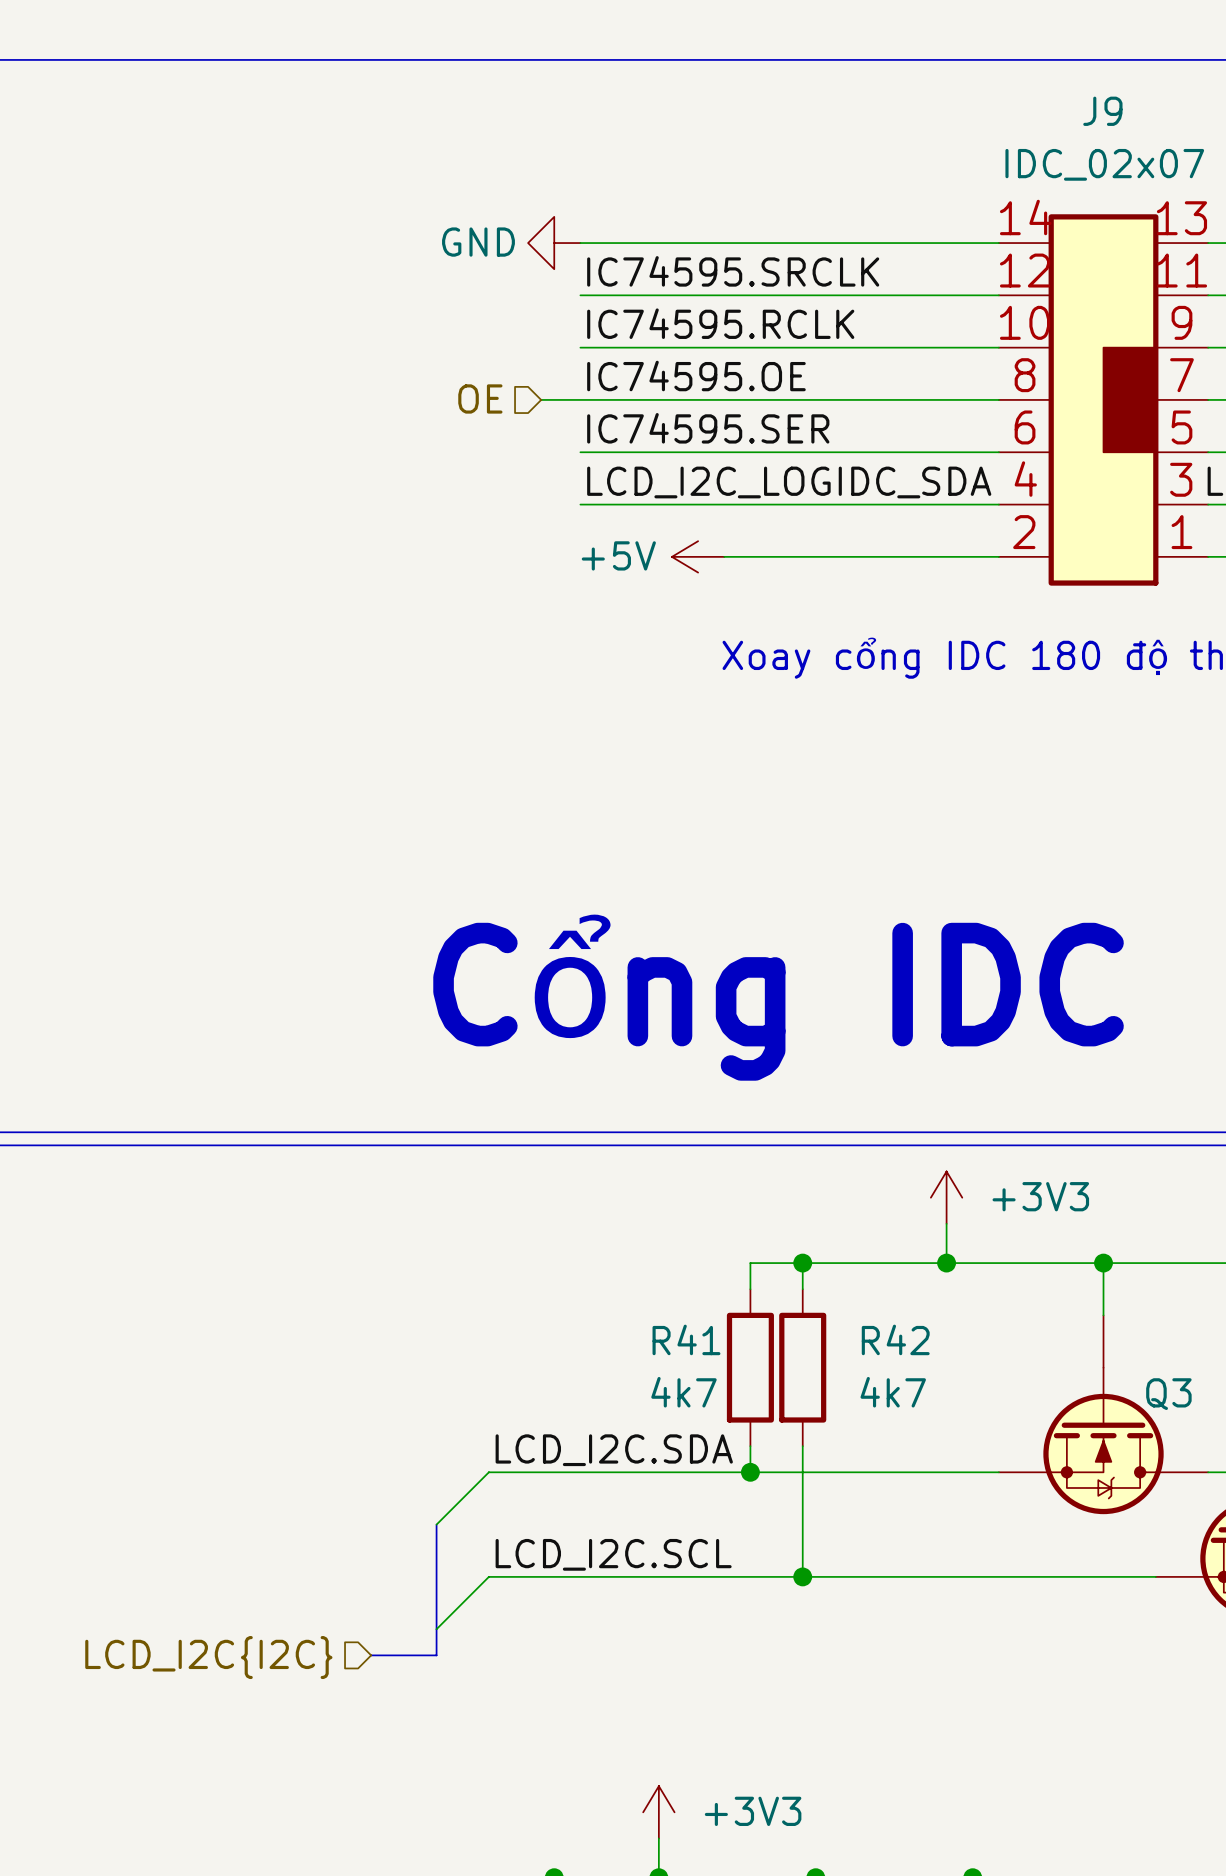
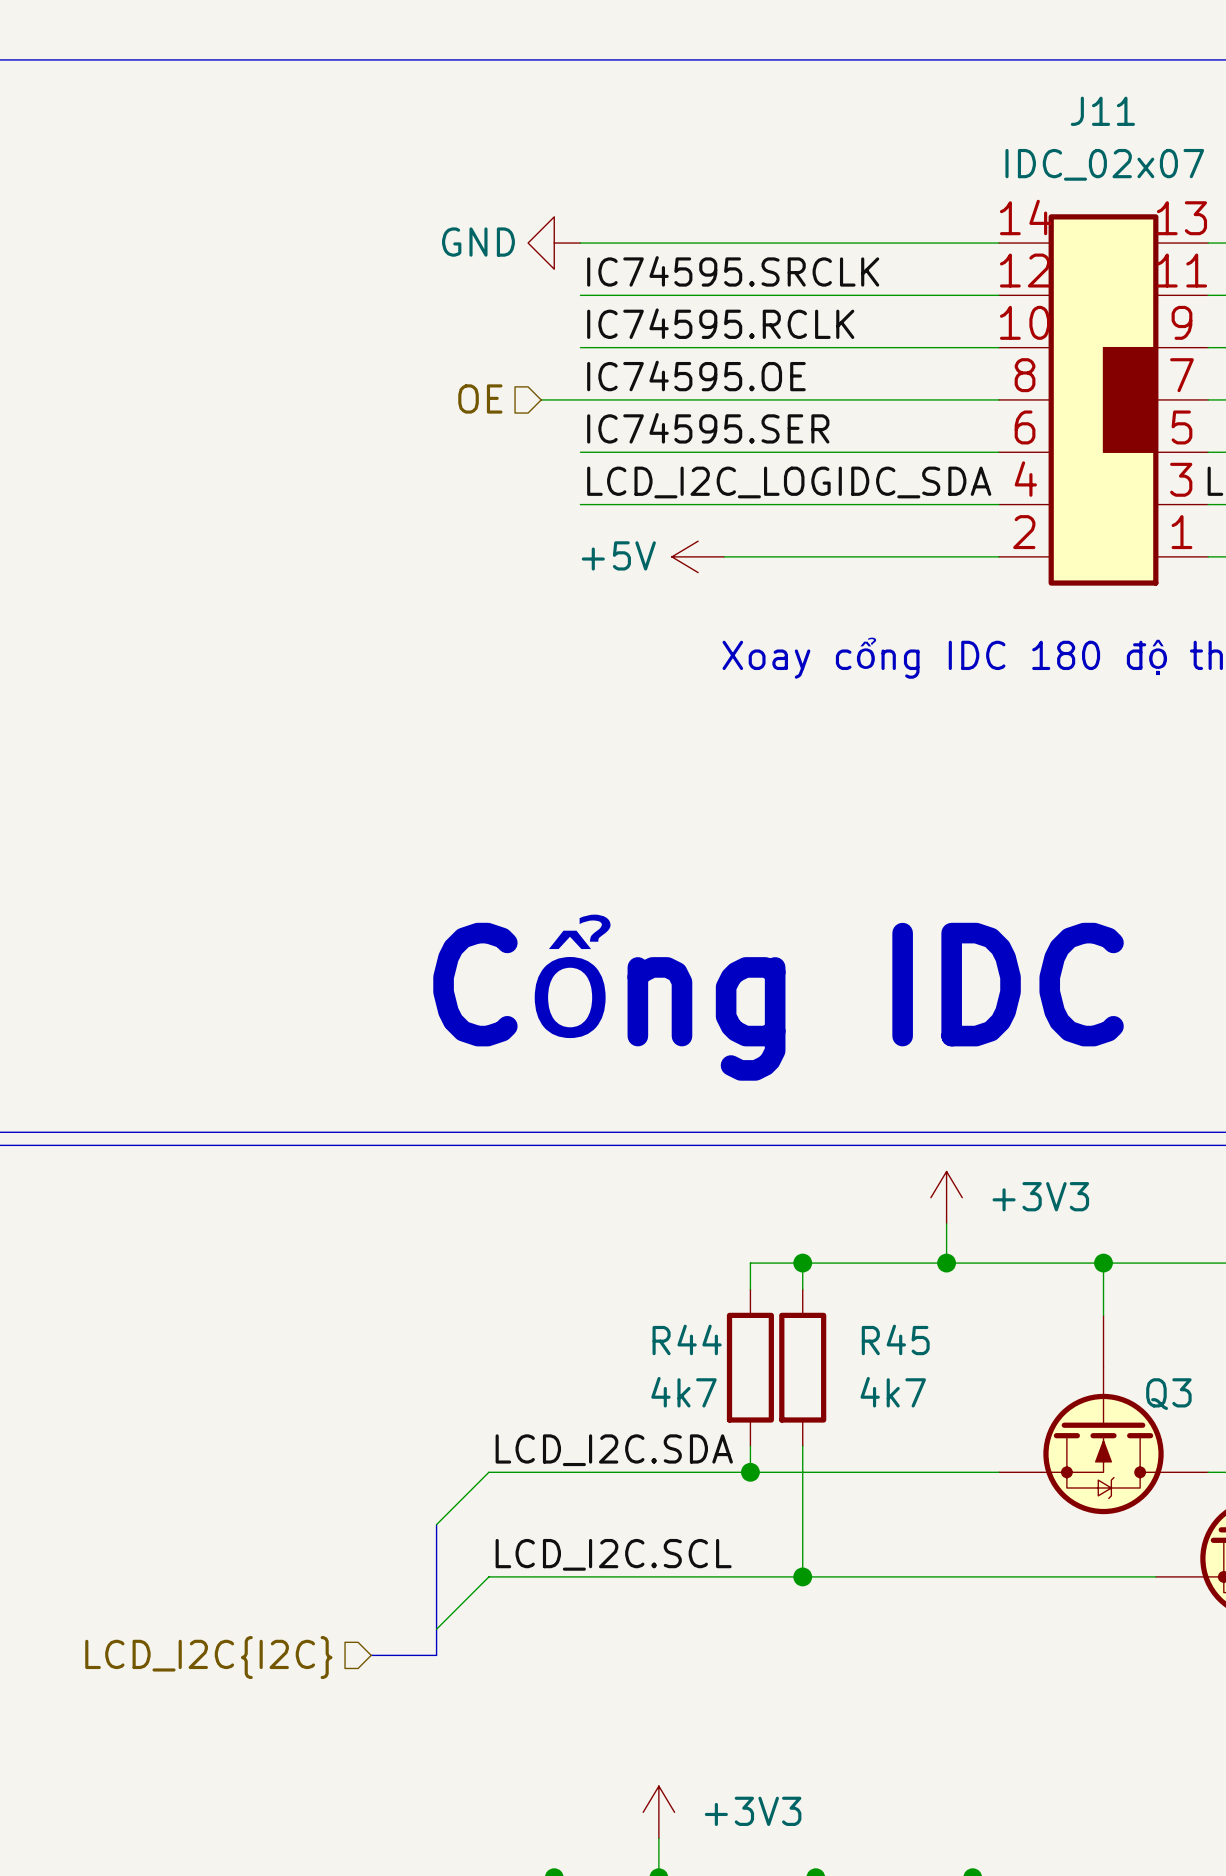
J9 name: J9 (1102, 111) -> J11 (1102, 111)
R41 name: R41 (686, 1339) -> R44 (687, 1339)
R42 name: R42 (895, 1339) -> R45 (895, 1339)

